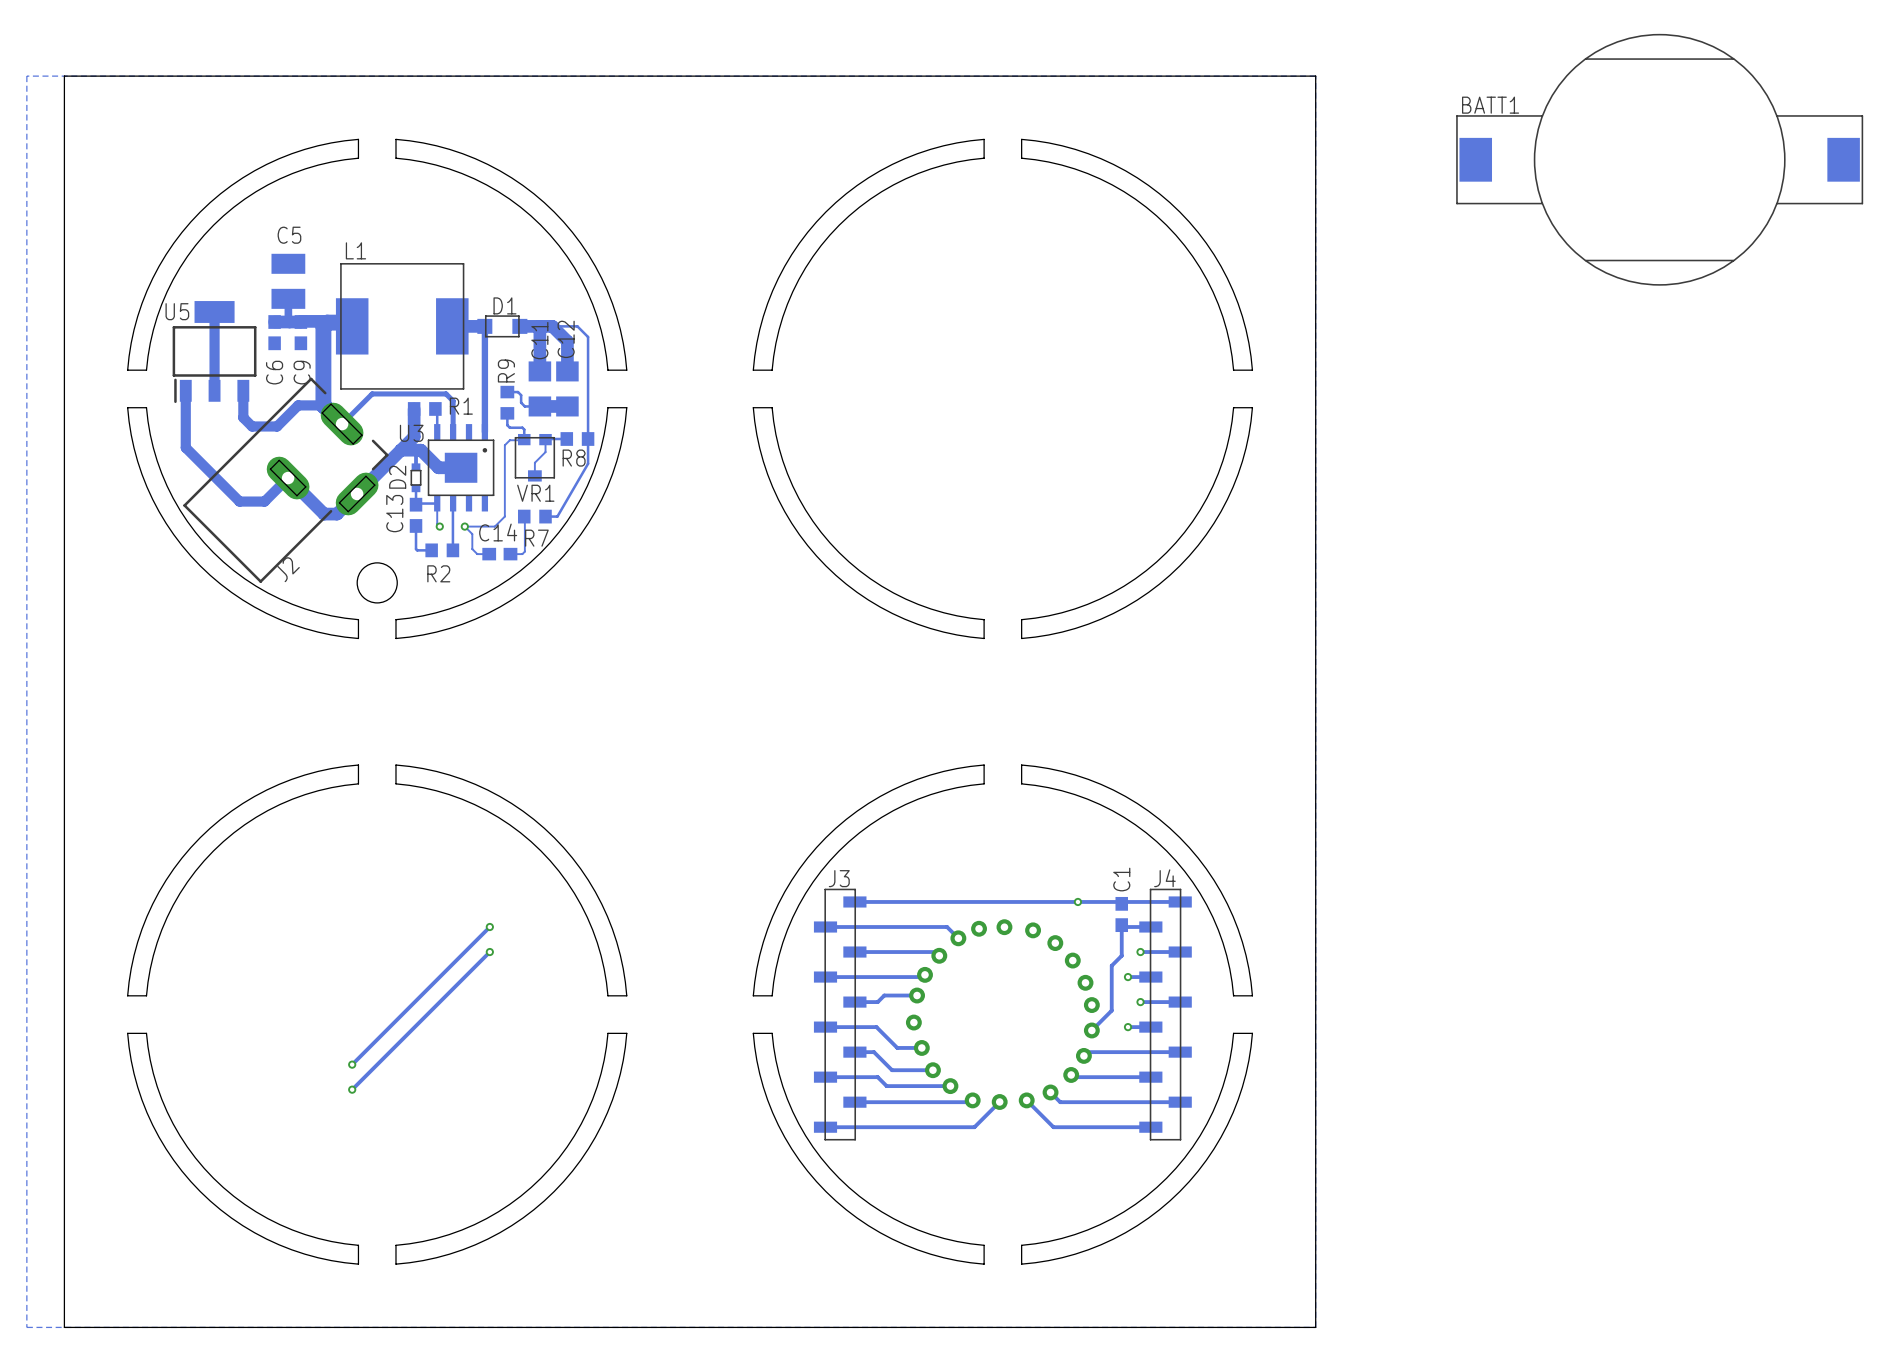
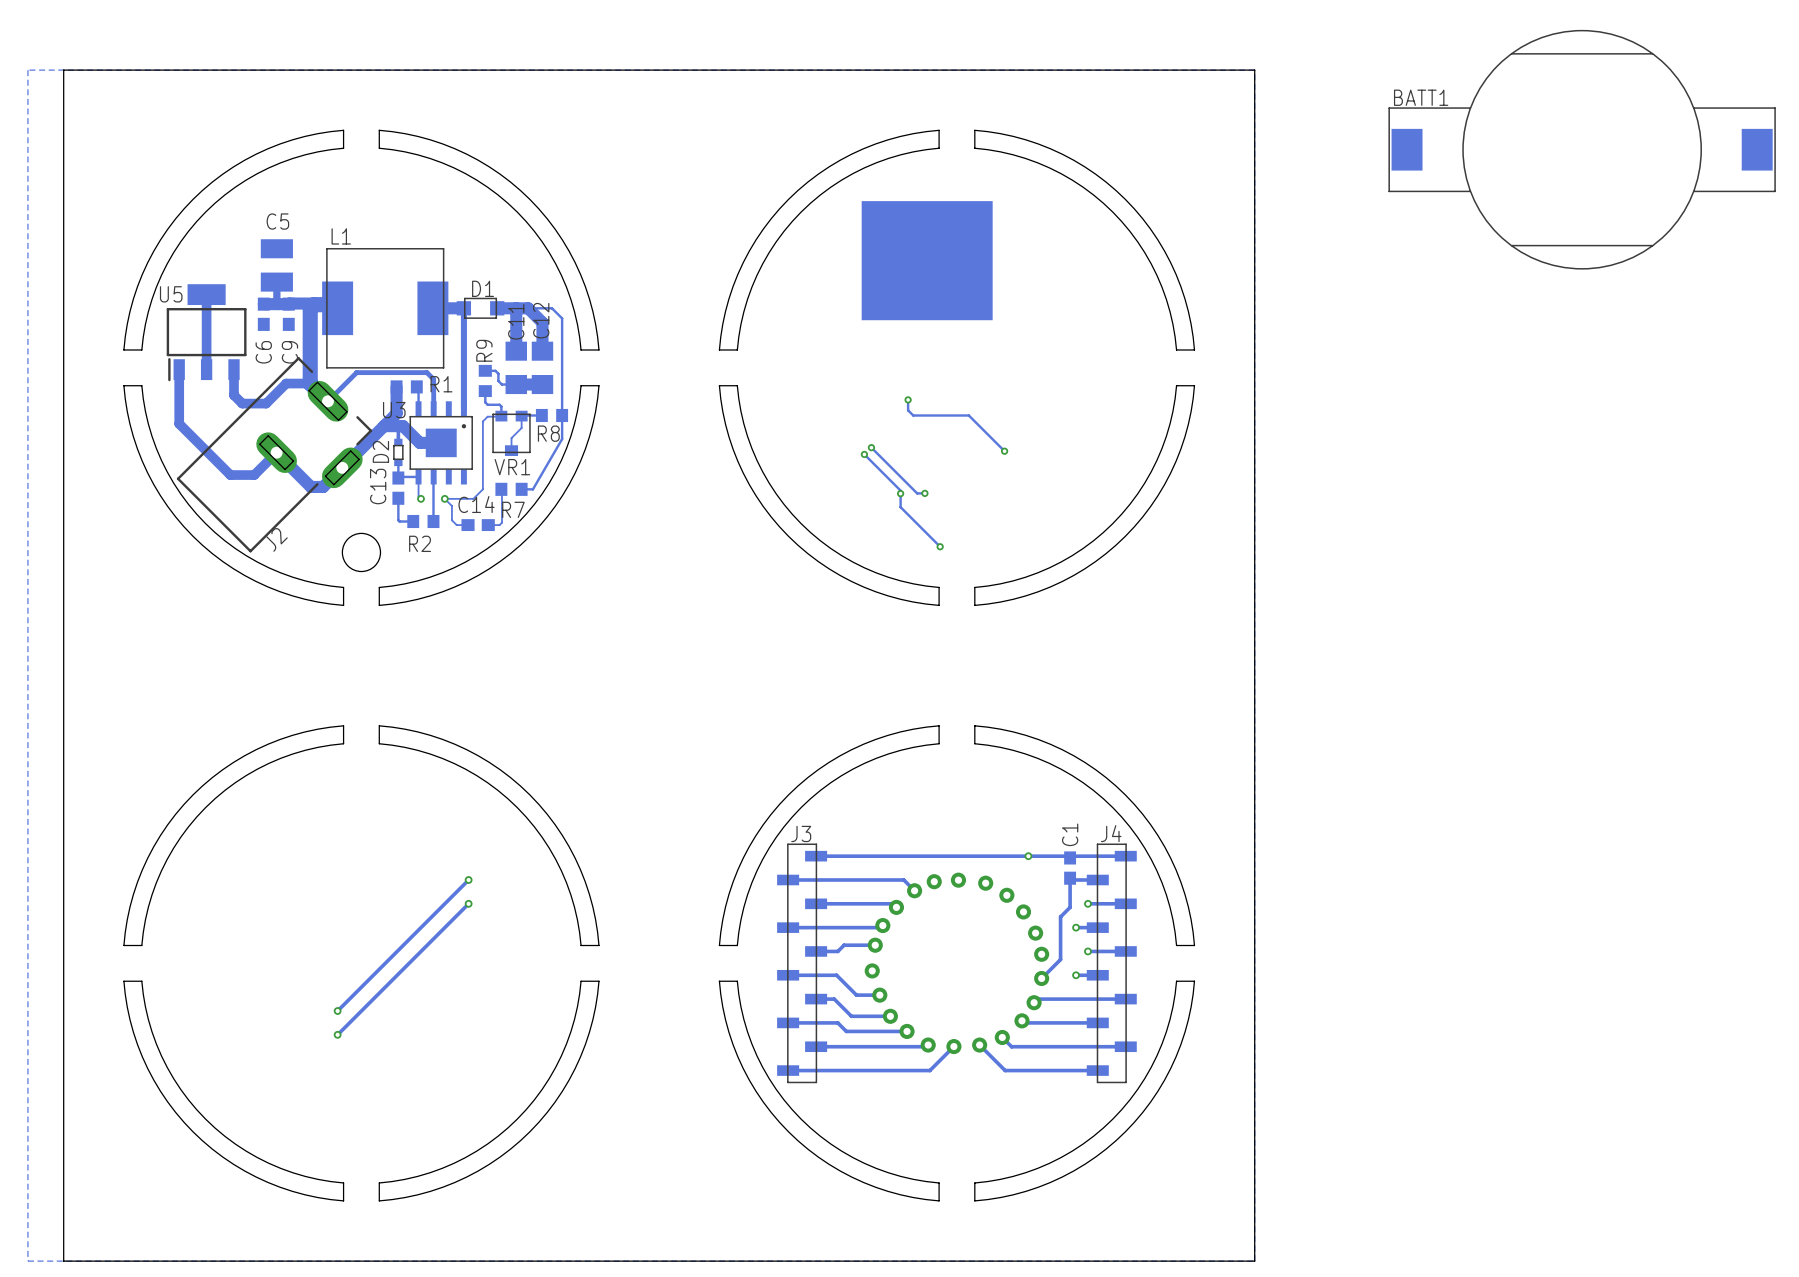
drawing: none -> [861, 201, 993, 321]
track: none -> (908, 399) (908, 410) (913, 415) (968, 415) (1004, 451)
via: none -> (908, 399)
track: none -> (871, 447) (917, 493) (924, 493)
via: none -> (871, 447)
via: none -> (1004, 451)
track: none -> (864, 454) (900, 490) (900, 507) (940, 546)
via: none -> (864, 454)
via: none -> (924, 493)
via: none -> (900, 493)
via: none -> (940, 546)

